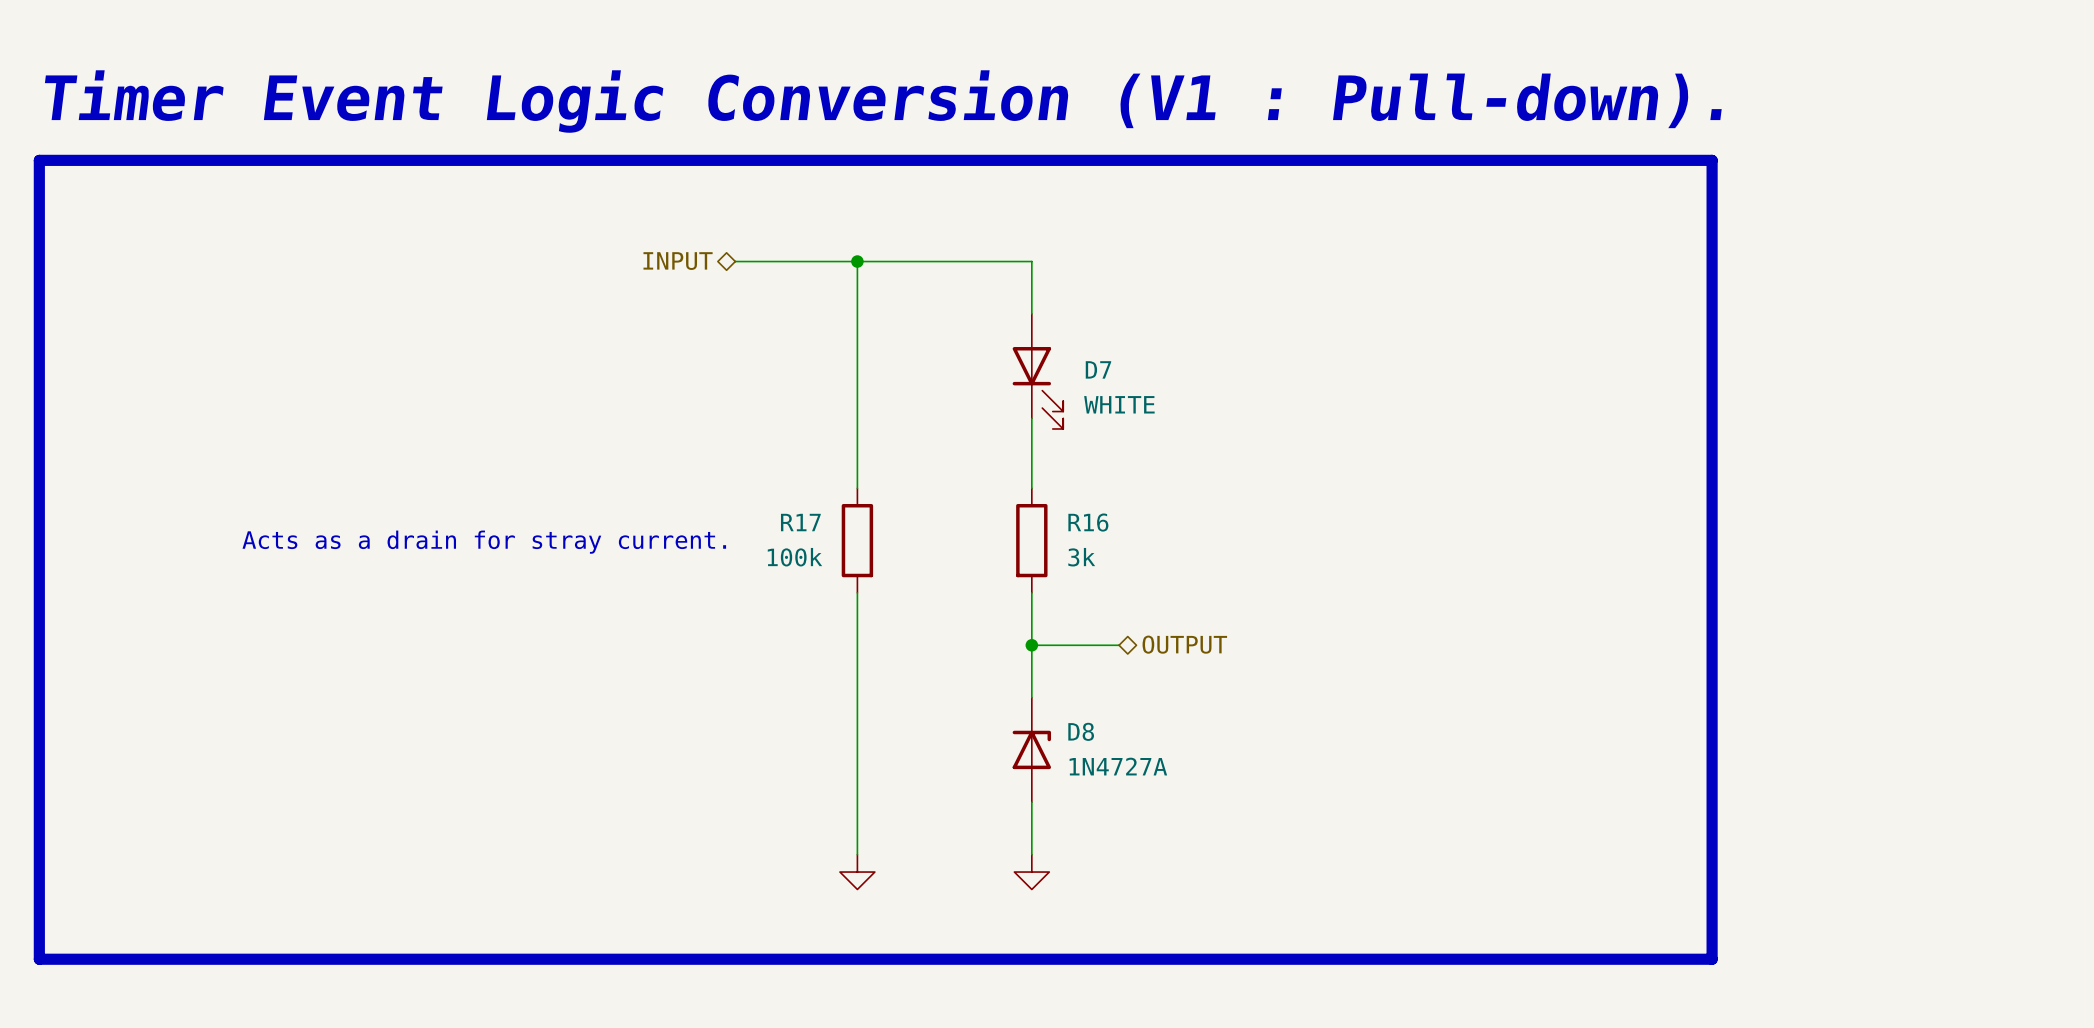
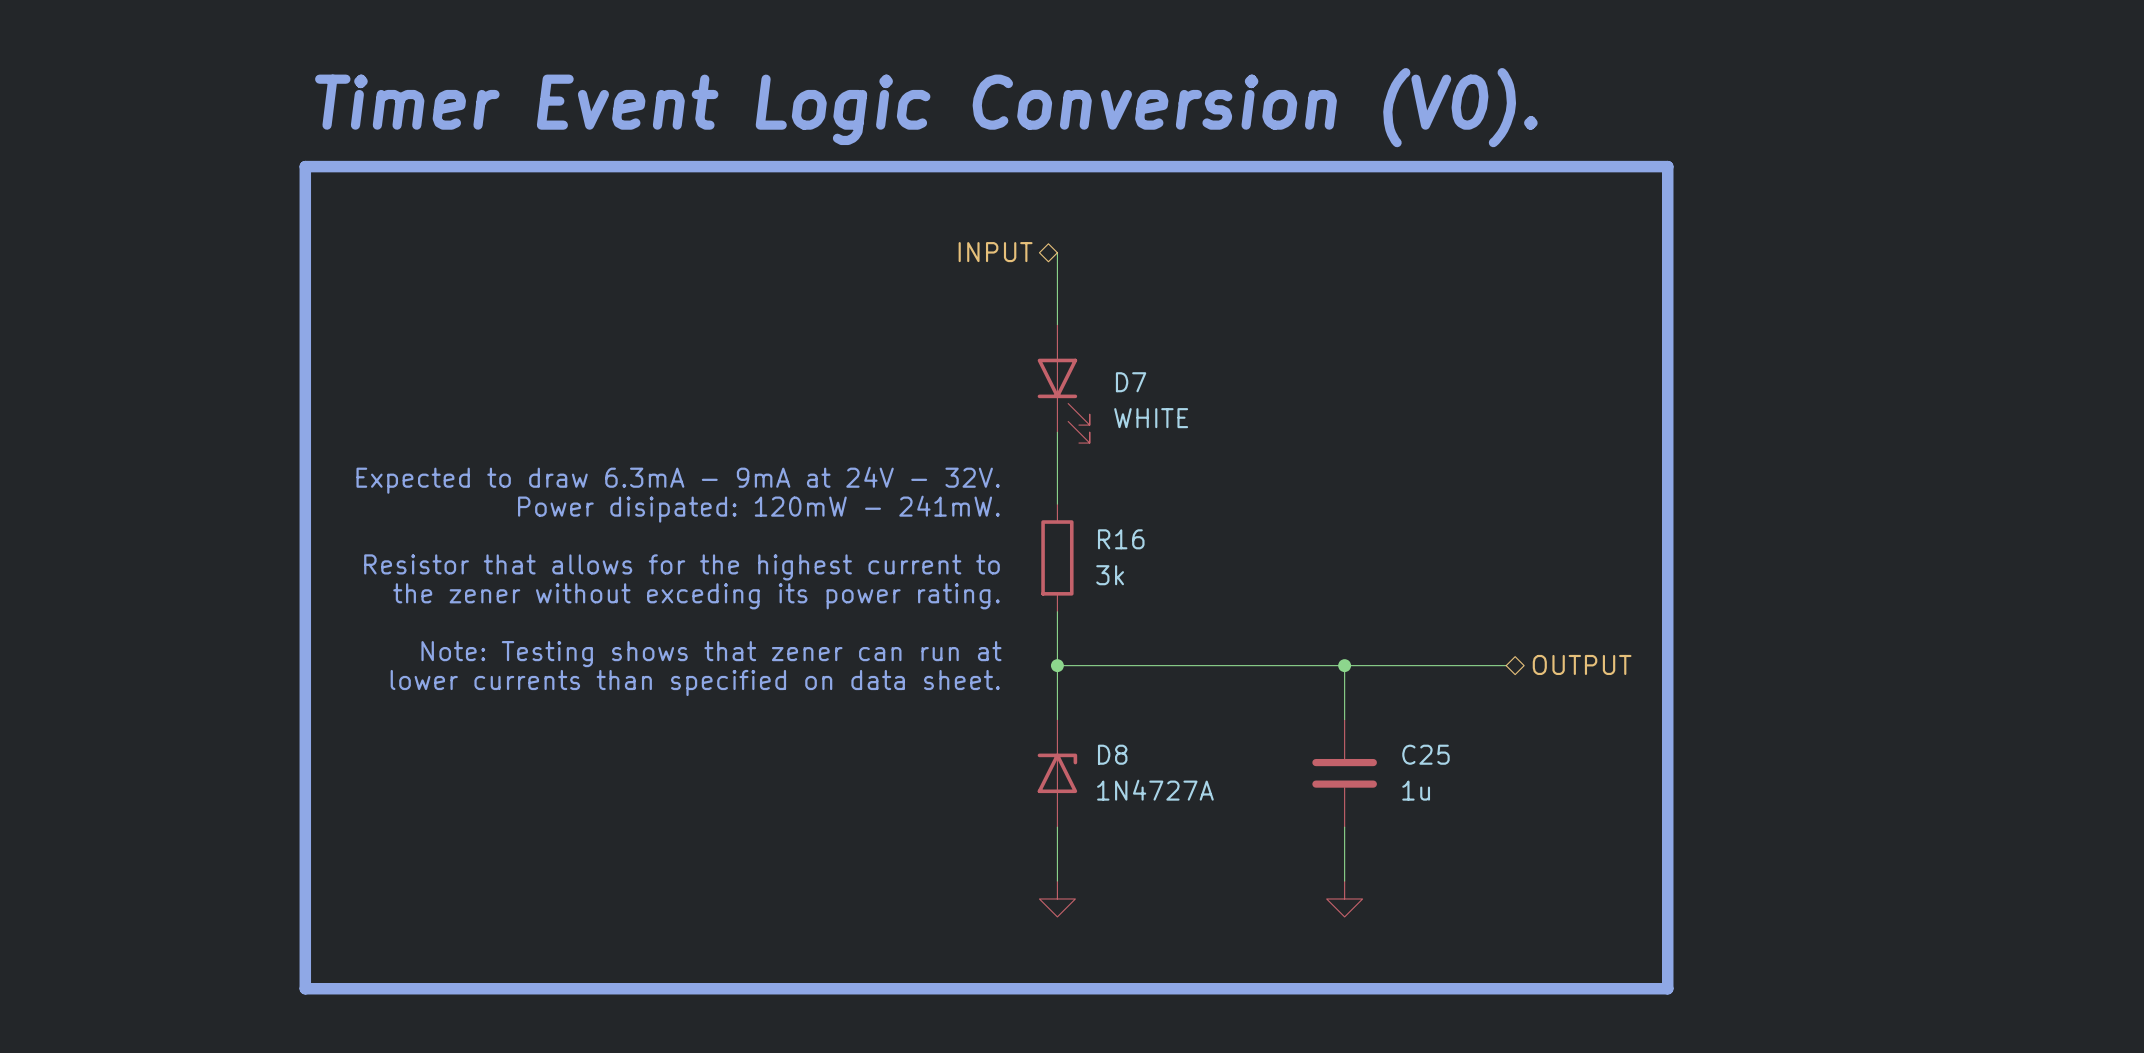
text: Timer Event Logic Conversion (V1 : Pull-down). (883, 101) -> Timer Event Logic Conversion (V0). (926, 107)
line: (300, 160) (39, 160) (39, 959) (300, 959) -> (305, 166) (305, 988)
line: (1624, 160) (1712, 160) (1712, 959) (1624, 959) -> (1667, 166) (1667, 988)
hierarchical label position: INPUT (678, 261) -> INPUT (995, 252)
wire: (735, 261) (1031, 261) -> (1057, 252) (1057, 270)
wire: (857, 261) (857, 488) -> none
junction: (857, 261) -> none
text: none -> Expected to draw 6.3mA - 9mA at 24V - 32V. (678, 480)
text: none -> Power disipated: 120mW - 241mW. (758, 509)
R17: 100k (857, 540) -> none
text: Acts as a drain for stray current. (484, 542) -> none
text: none -> Resistor that allows for the highest current to (681, 567)
text: none -> the zener without exceding its power rating. (696, 596)
wire: (857, 592) (857, 854) -> none
text: none -> Note: Testing shows that zener can run at (711, 654)
hierarchical label: OUTPUT (1184, 644) -> none
hierarchical label: none -> OUTPUT (1582, 664)
wire: none -> (1147, 665) (1506, 665)
wire: none -> (1344, 665) (1344, 719)
junction: none -> (1344, 665)
text: none -> lower currents than specified on data sheet. (695, 682)
C25: none -> 1u (1344, 773)
wire: none -> (1344, 827) (1344, 881)
power symbol: (857, 872) -> none
power symbol: none -> (1344, 898)

